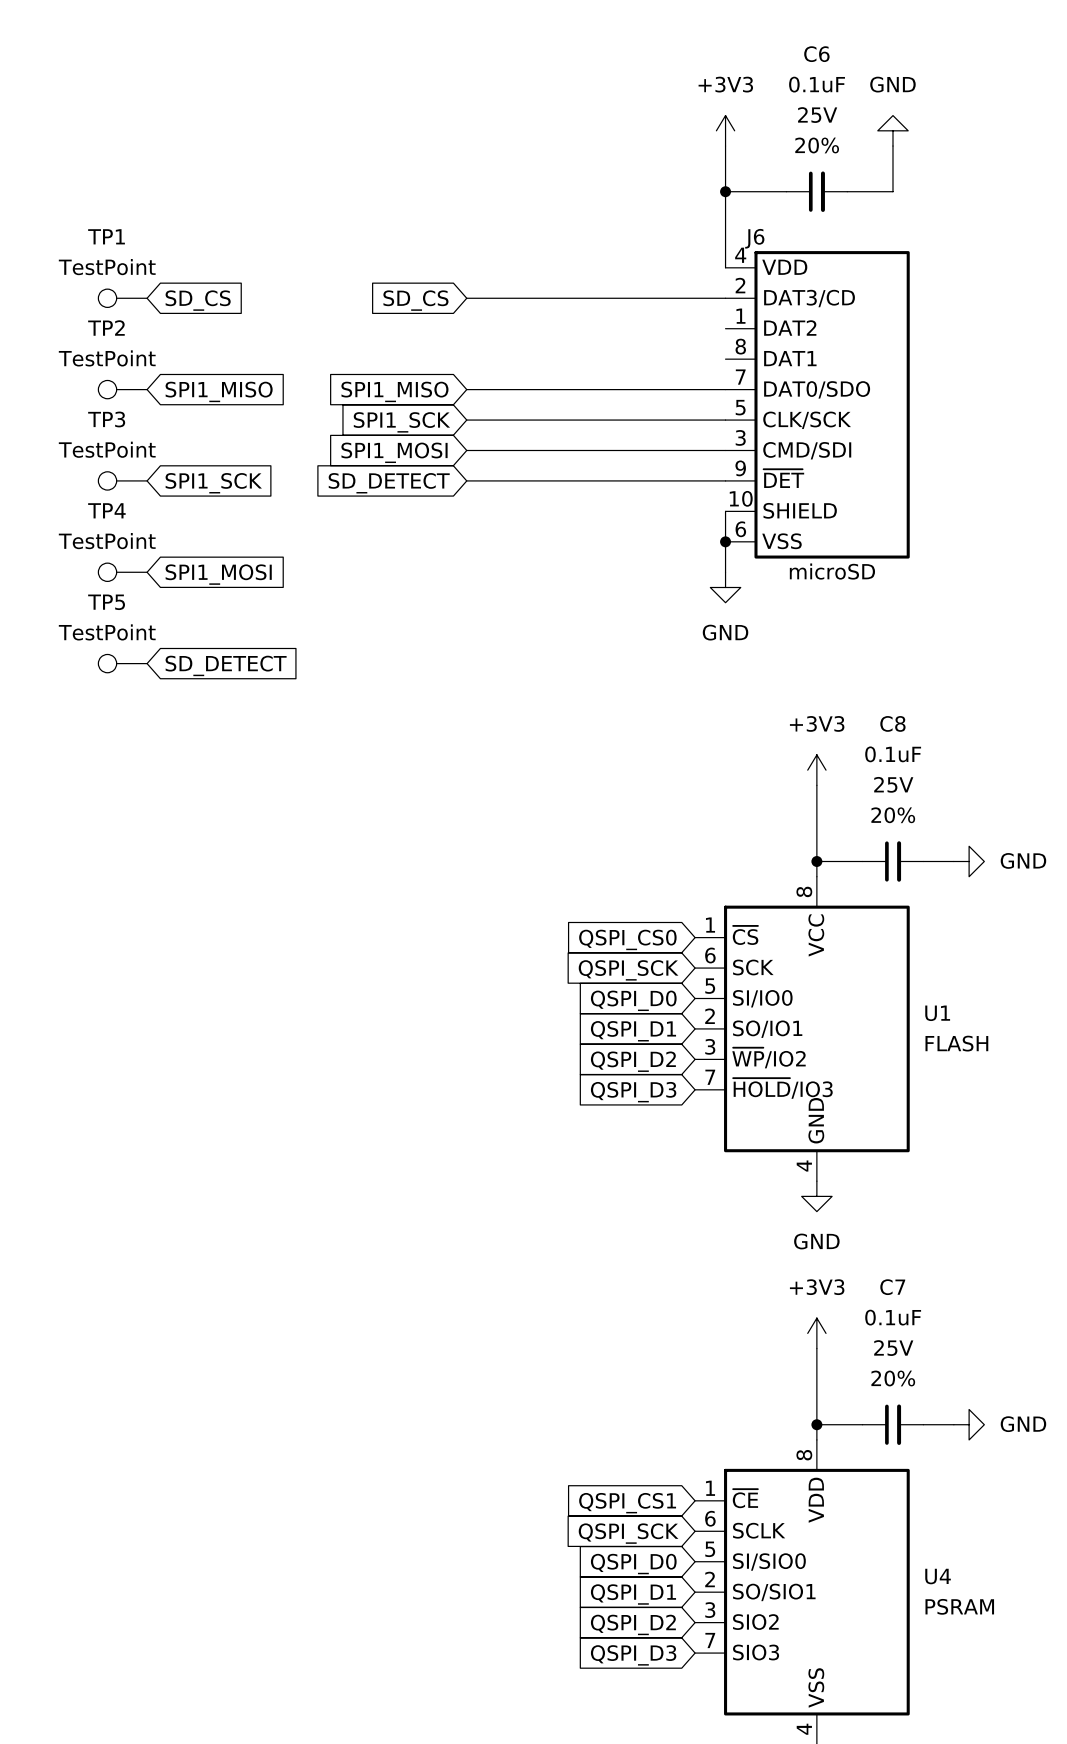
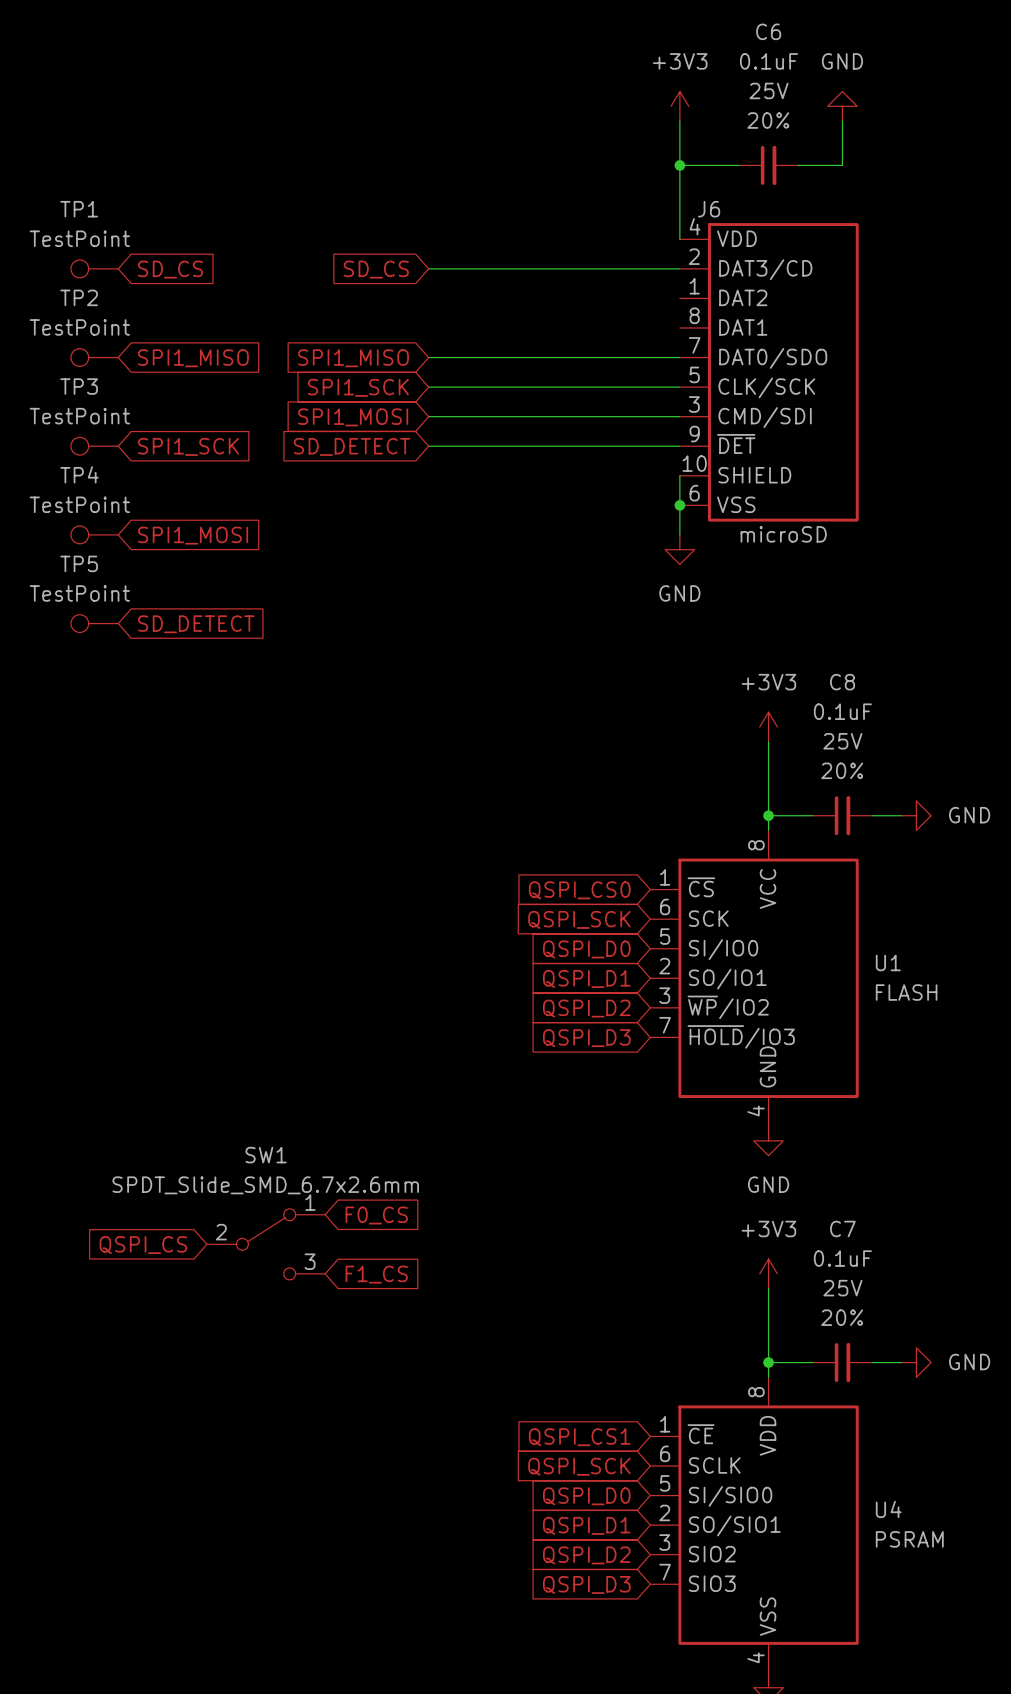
global label: none -> F0_CS (376, 1215)
SW1: none -> SPDT_Slide_SMD_6.7x2.6mm (266, 1244)
global label: none -> QSPI_CS (143, 1245)
global label: none -> F1_CS (376, 1274)

